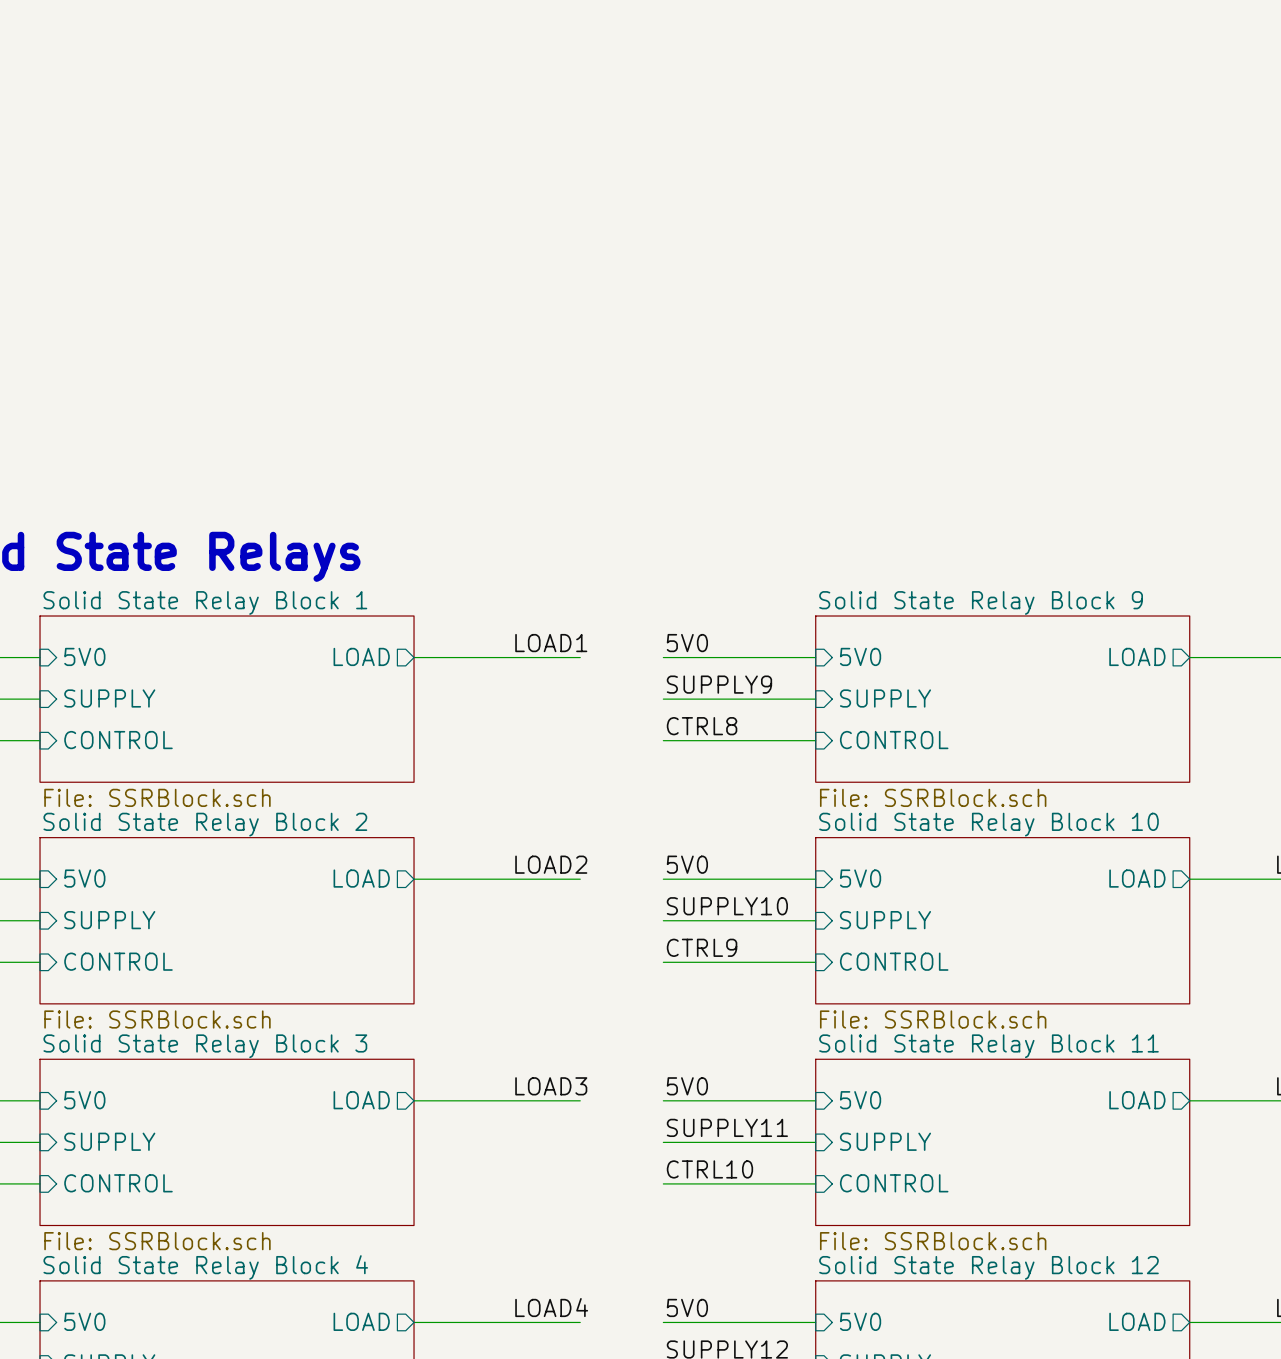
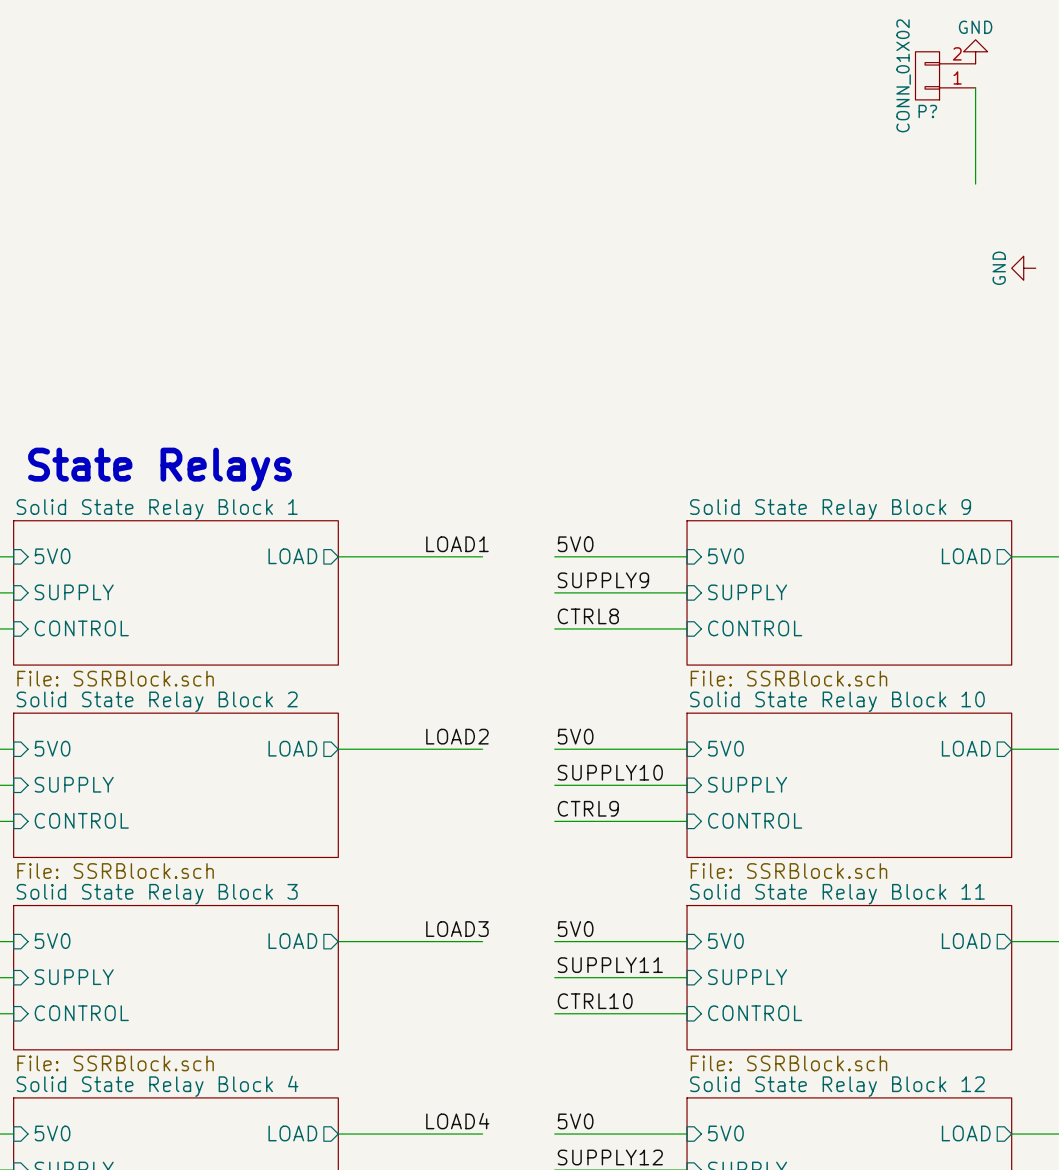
power symbol: none -> GND (975, 51)
P?: none -> CONN_01X02 (945, 75)
wire: none -> (975, 87) (975, 184)
power symbol: none -> GND (1023, 268)

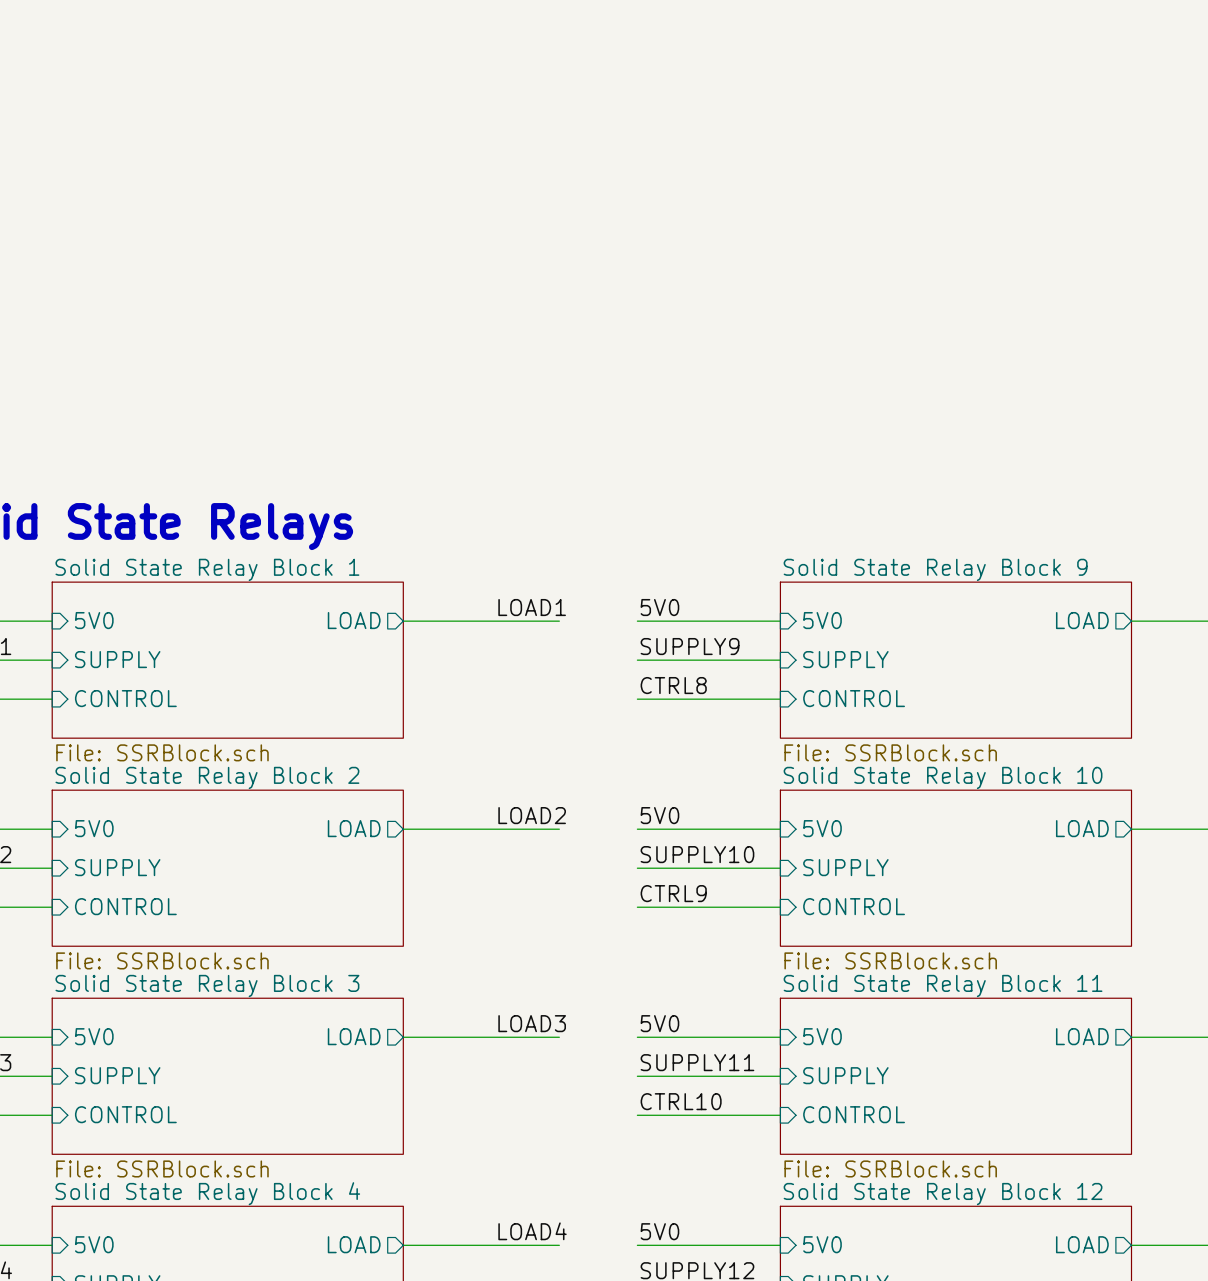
power symbol: GND (975, 51) -> none
P?: CONN_01X02 (945, 75) -> none
wire: (975, 87) (975, 184) -> none
power symbol: GND (1023, 268) -> none

